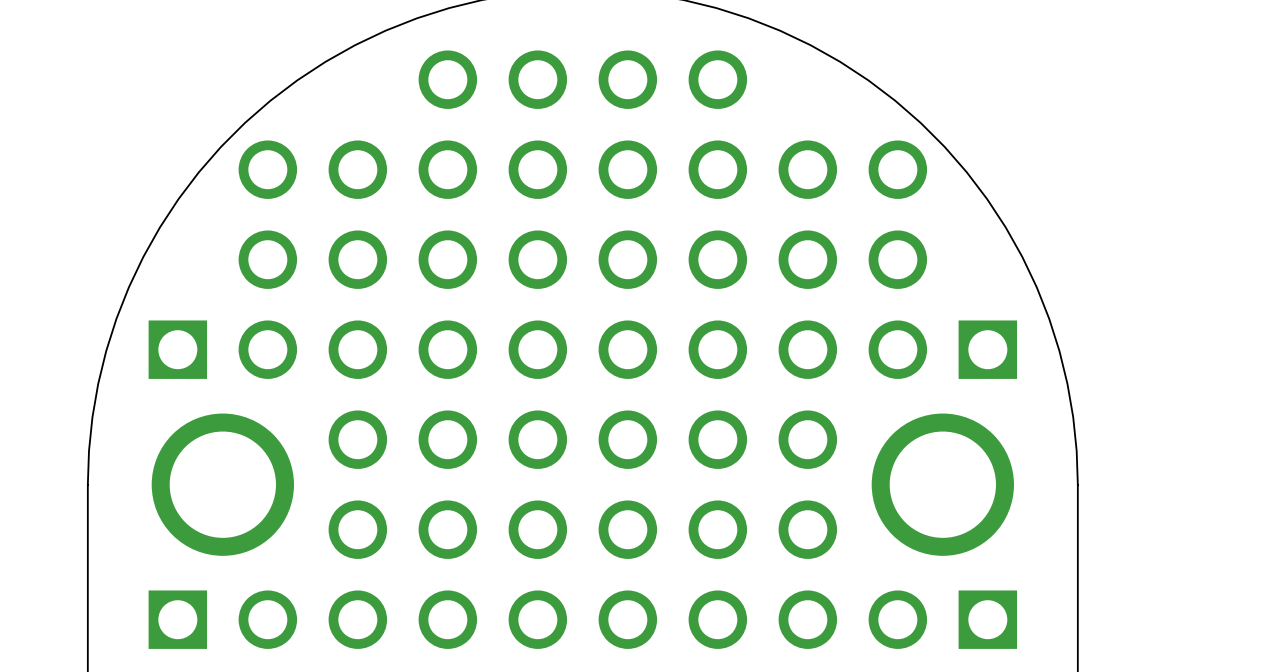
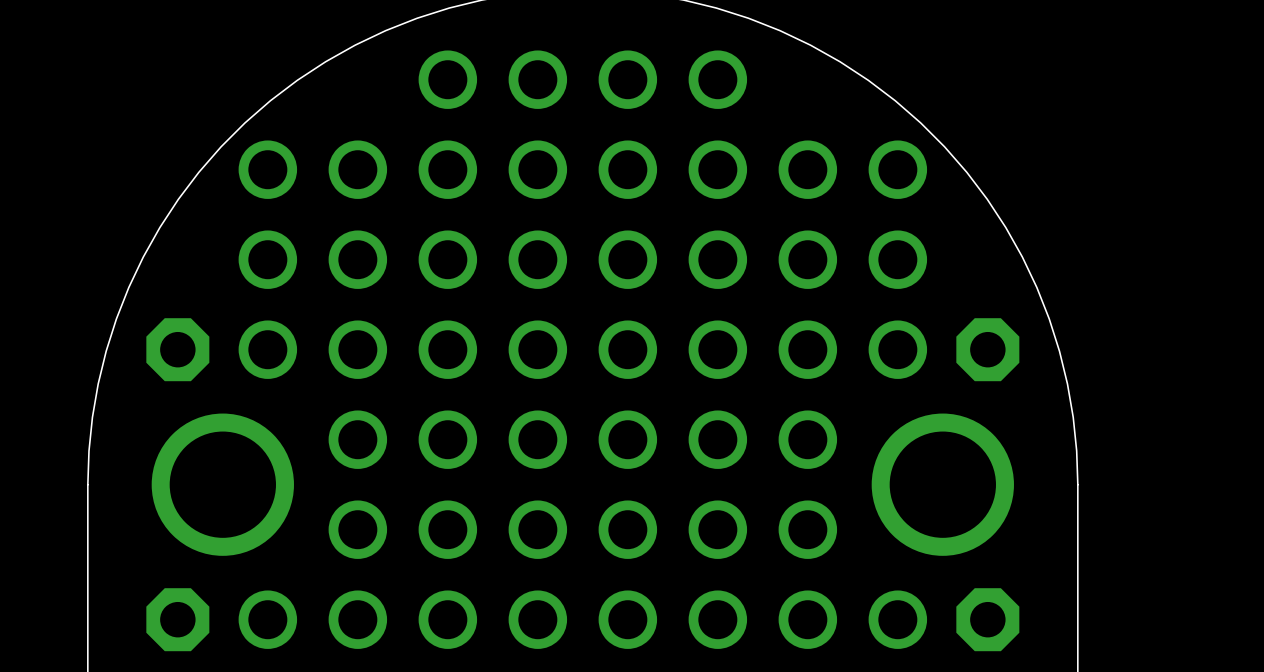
part footprint: [148, 320, 208, 379] -> [146, 318, 210, 382]
part footprint: [958, 320, 1018, 379] -> [956, 318, 1020, 382]
part footprint: [148, 590, 208, 649] -> [146, 588, 210, 652]
part footprint: [958, 590, 1018, 649] -> [956, 588, 1020, 652]

